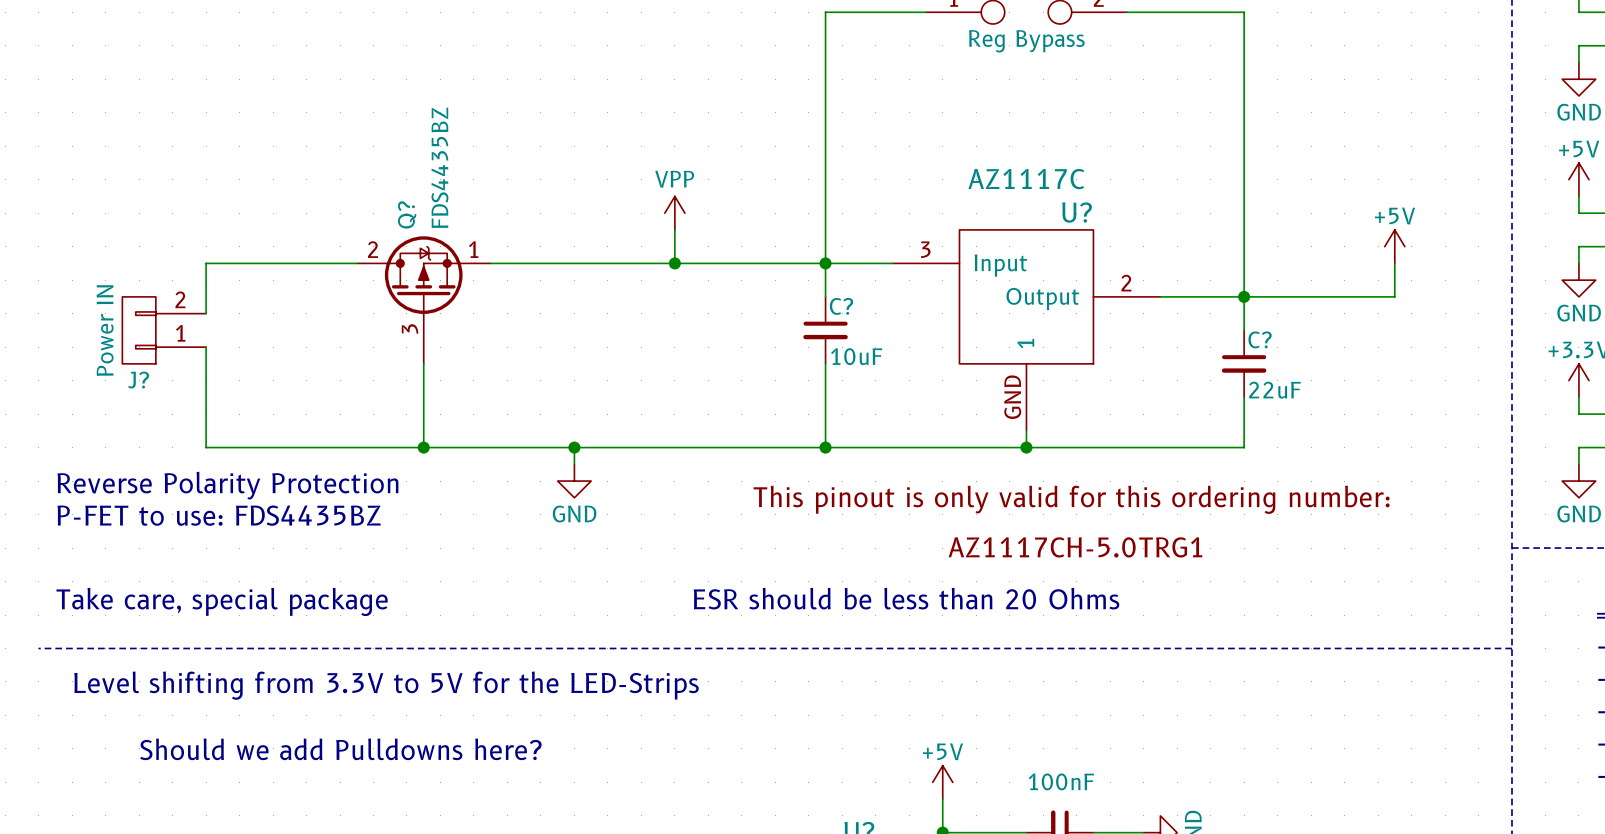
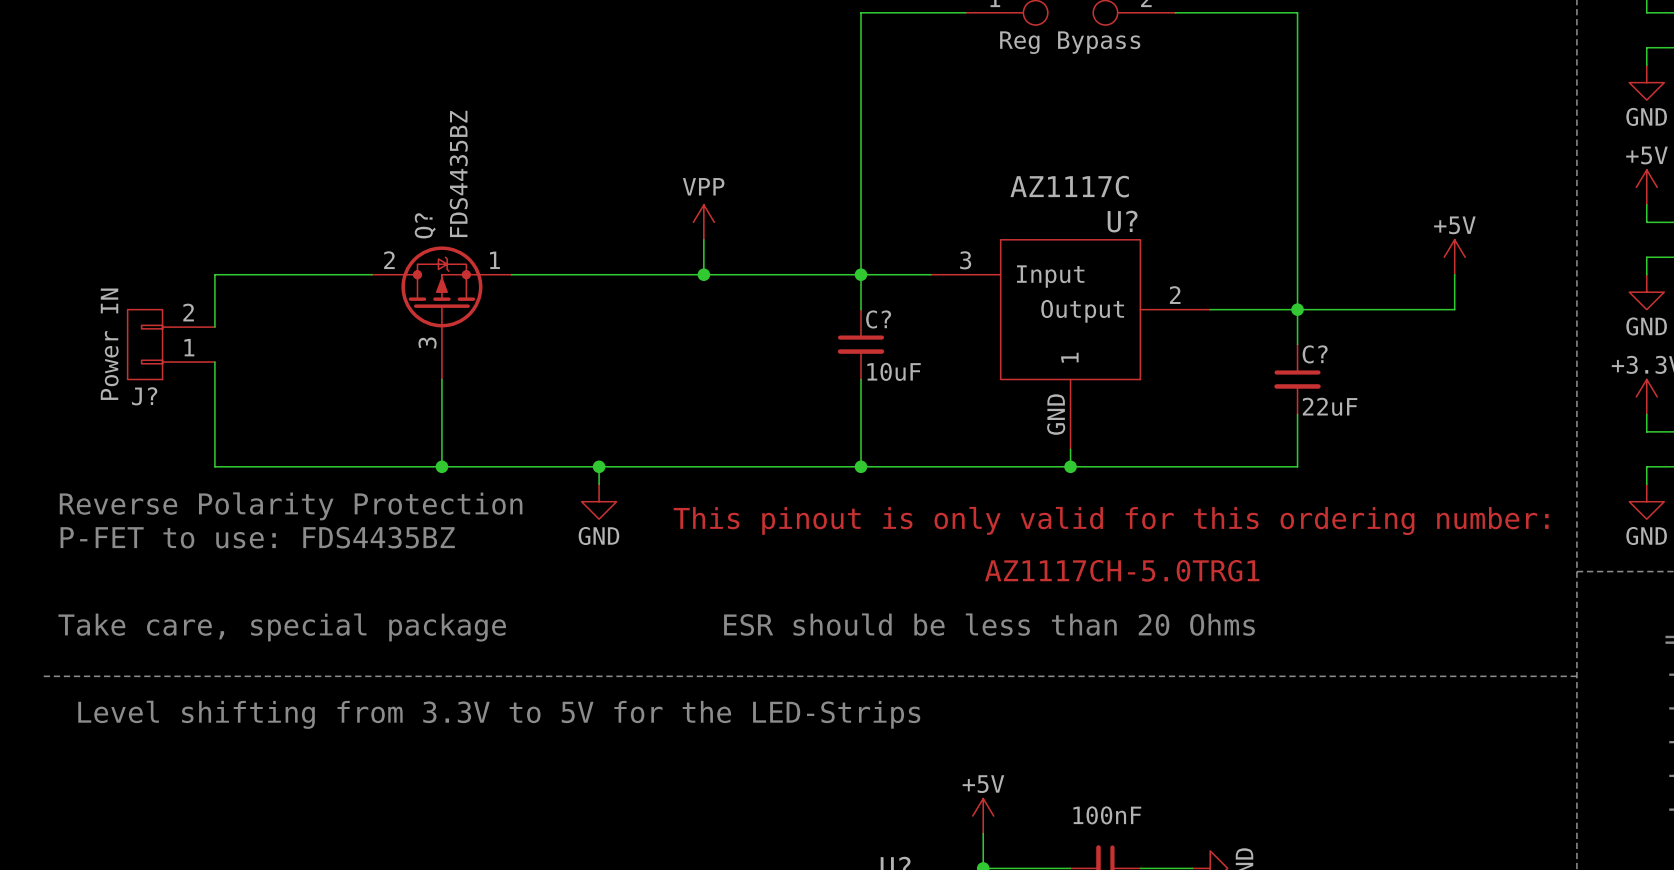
text: Should we add Pulldowns here? (340, 749) -> none

